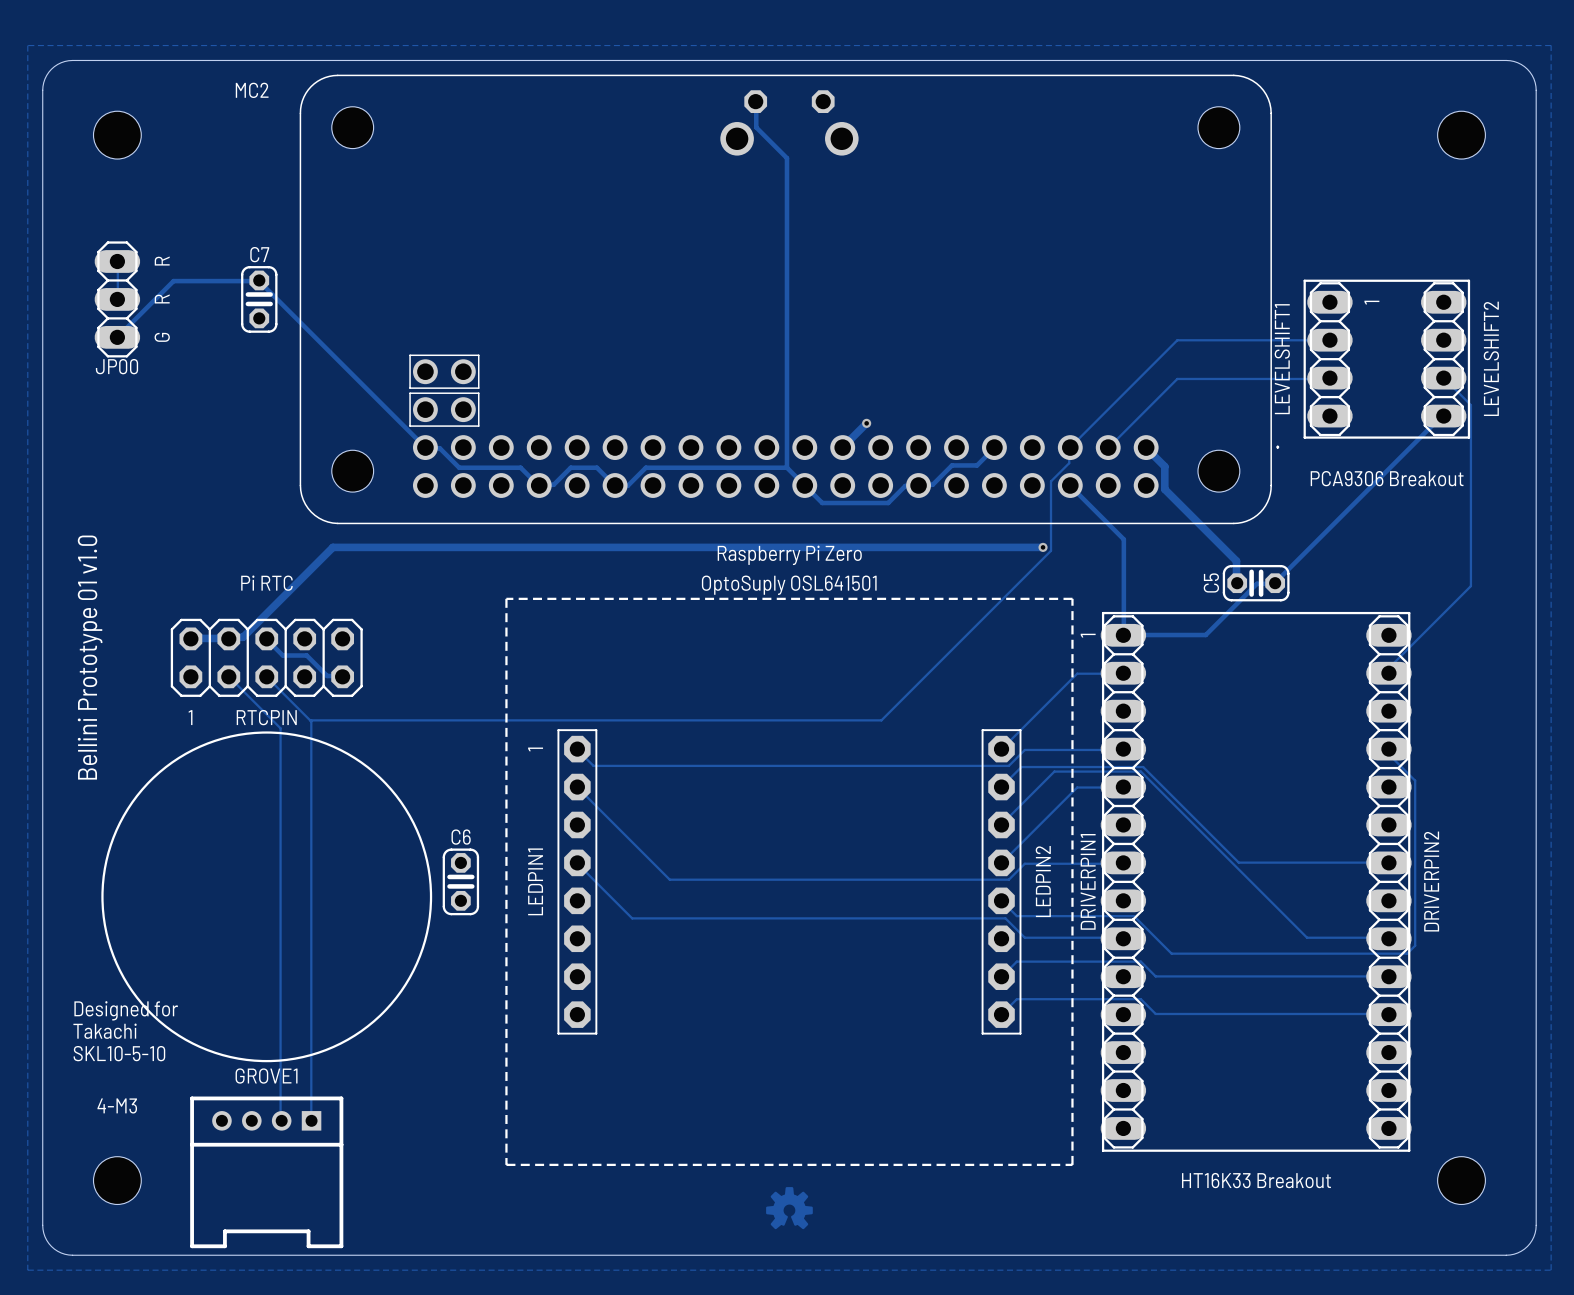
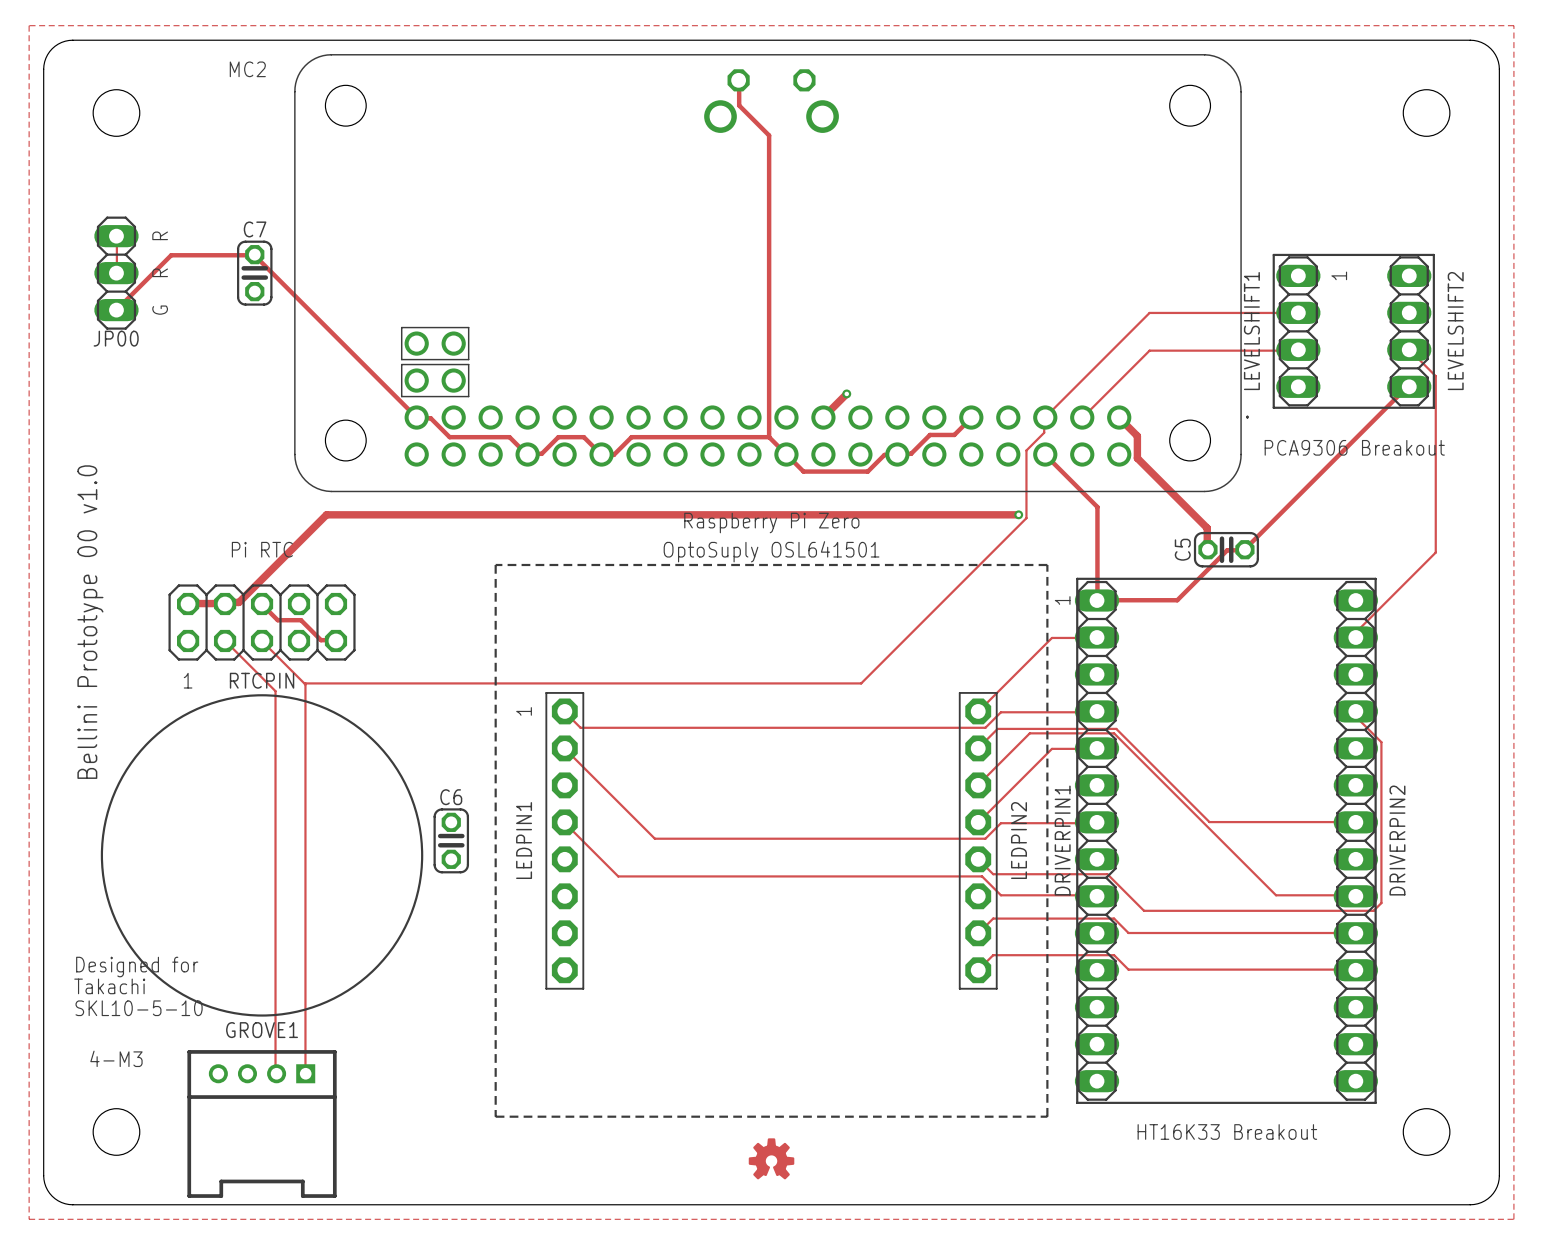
text: Bellini Prototype 01 v1.0 (90, 657) -> Bellini Prototype 00 v1.0 (90, 622)

